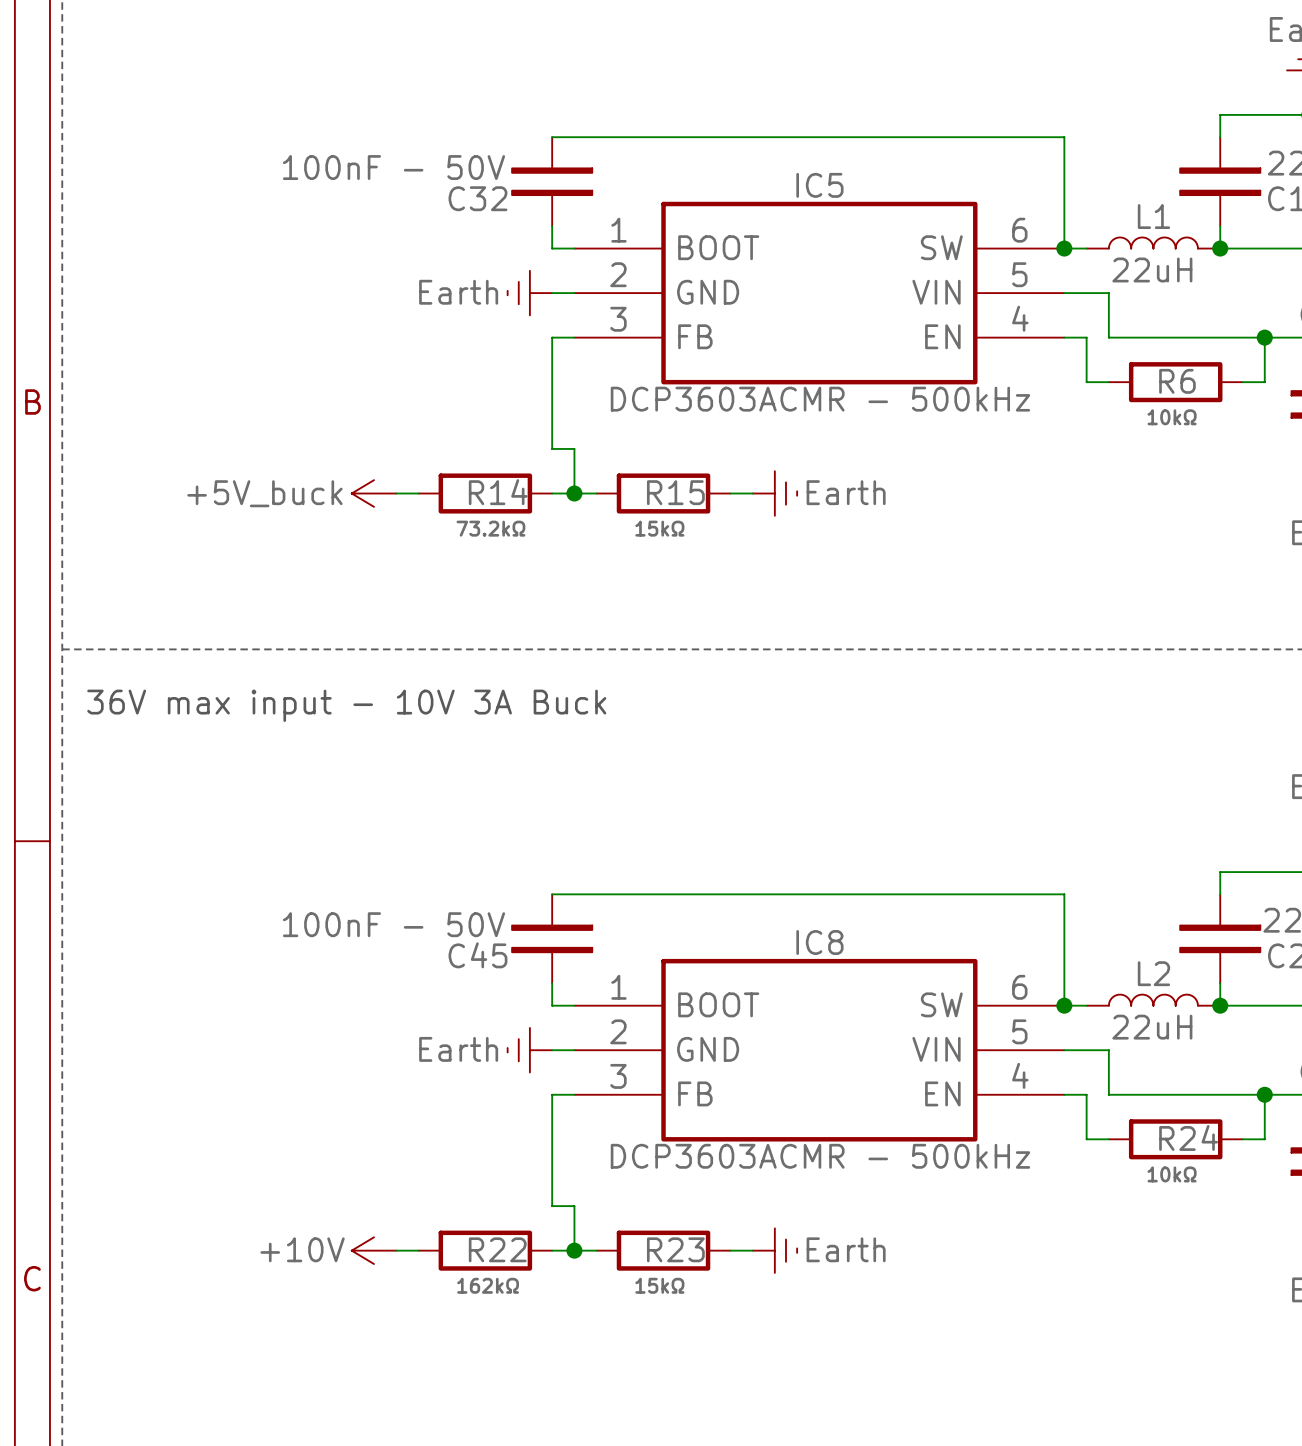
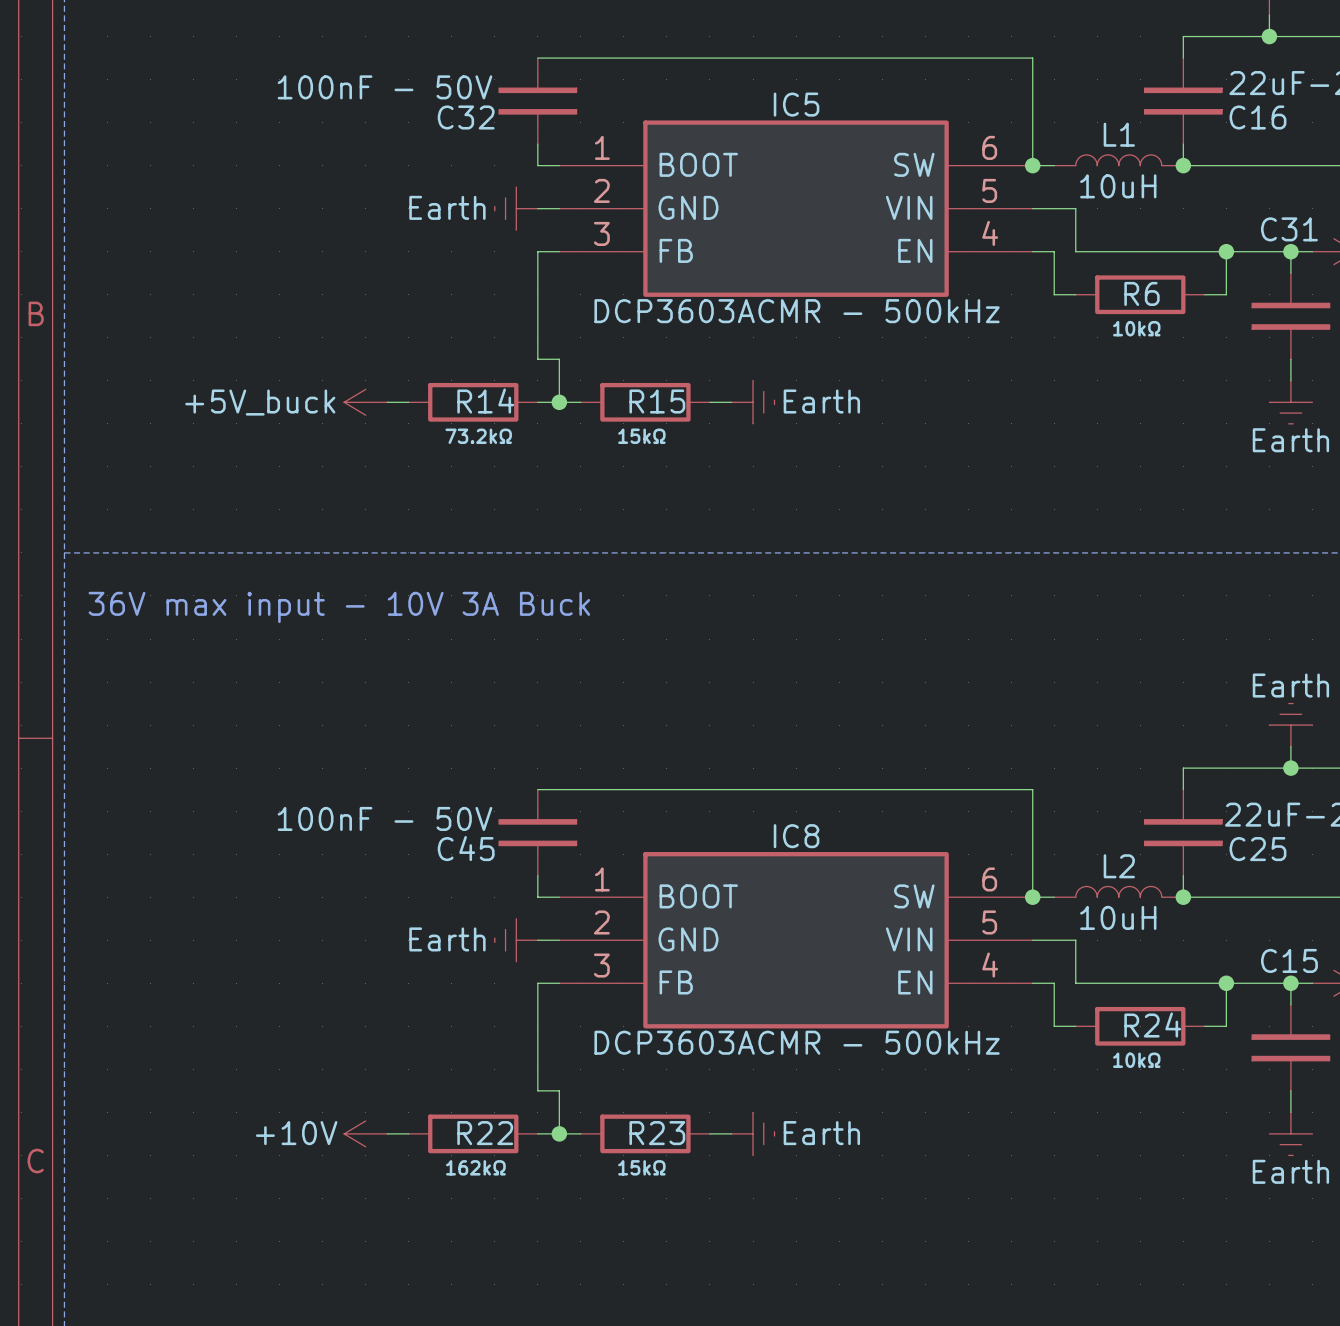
L1 value: 22uH (1152, 269) -> 10uH (1118, 186)
L2 value: 22uH (1152, 1027) -> 10uH (1118, 917)

